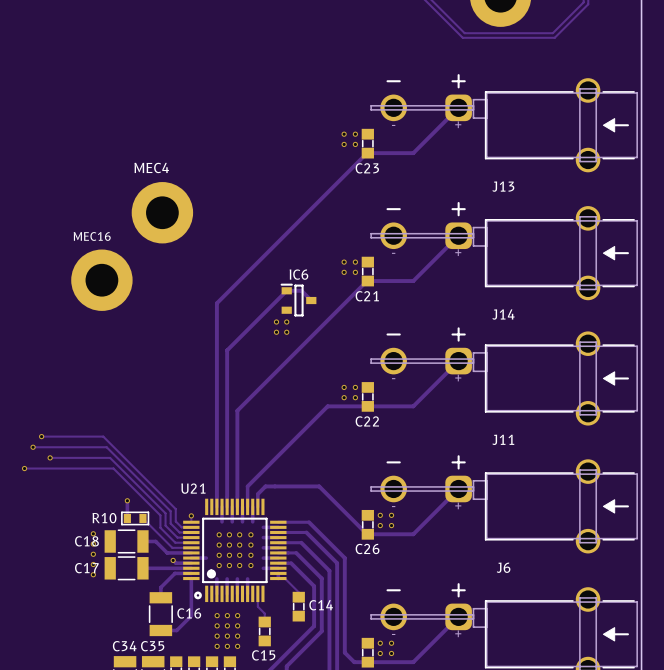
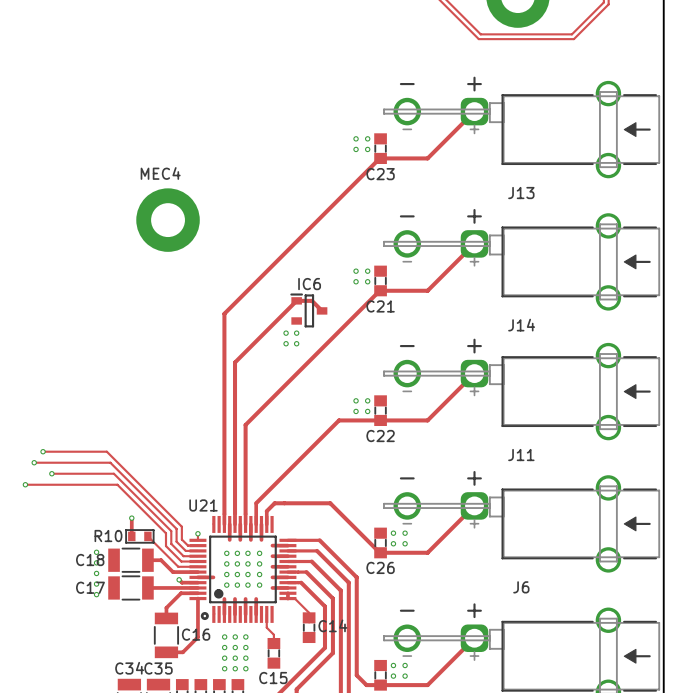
MEC16: (101, 280) -> none

